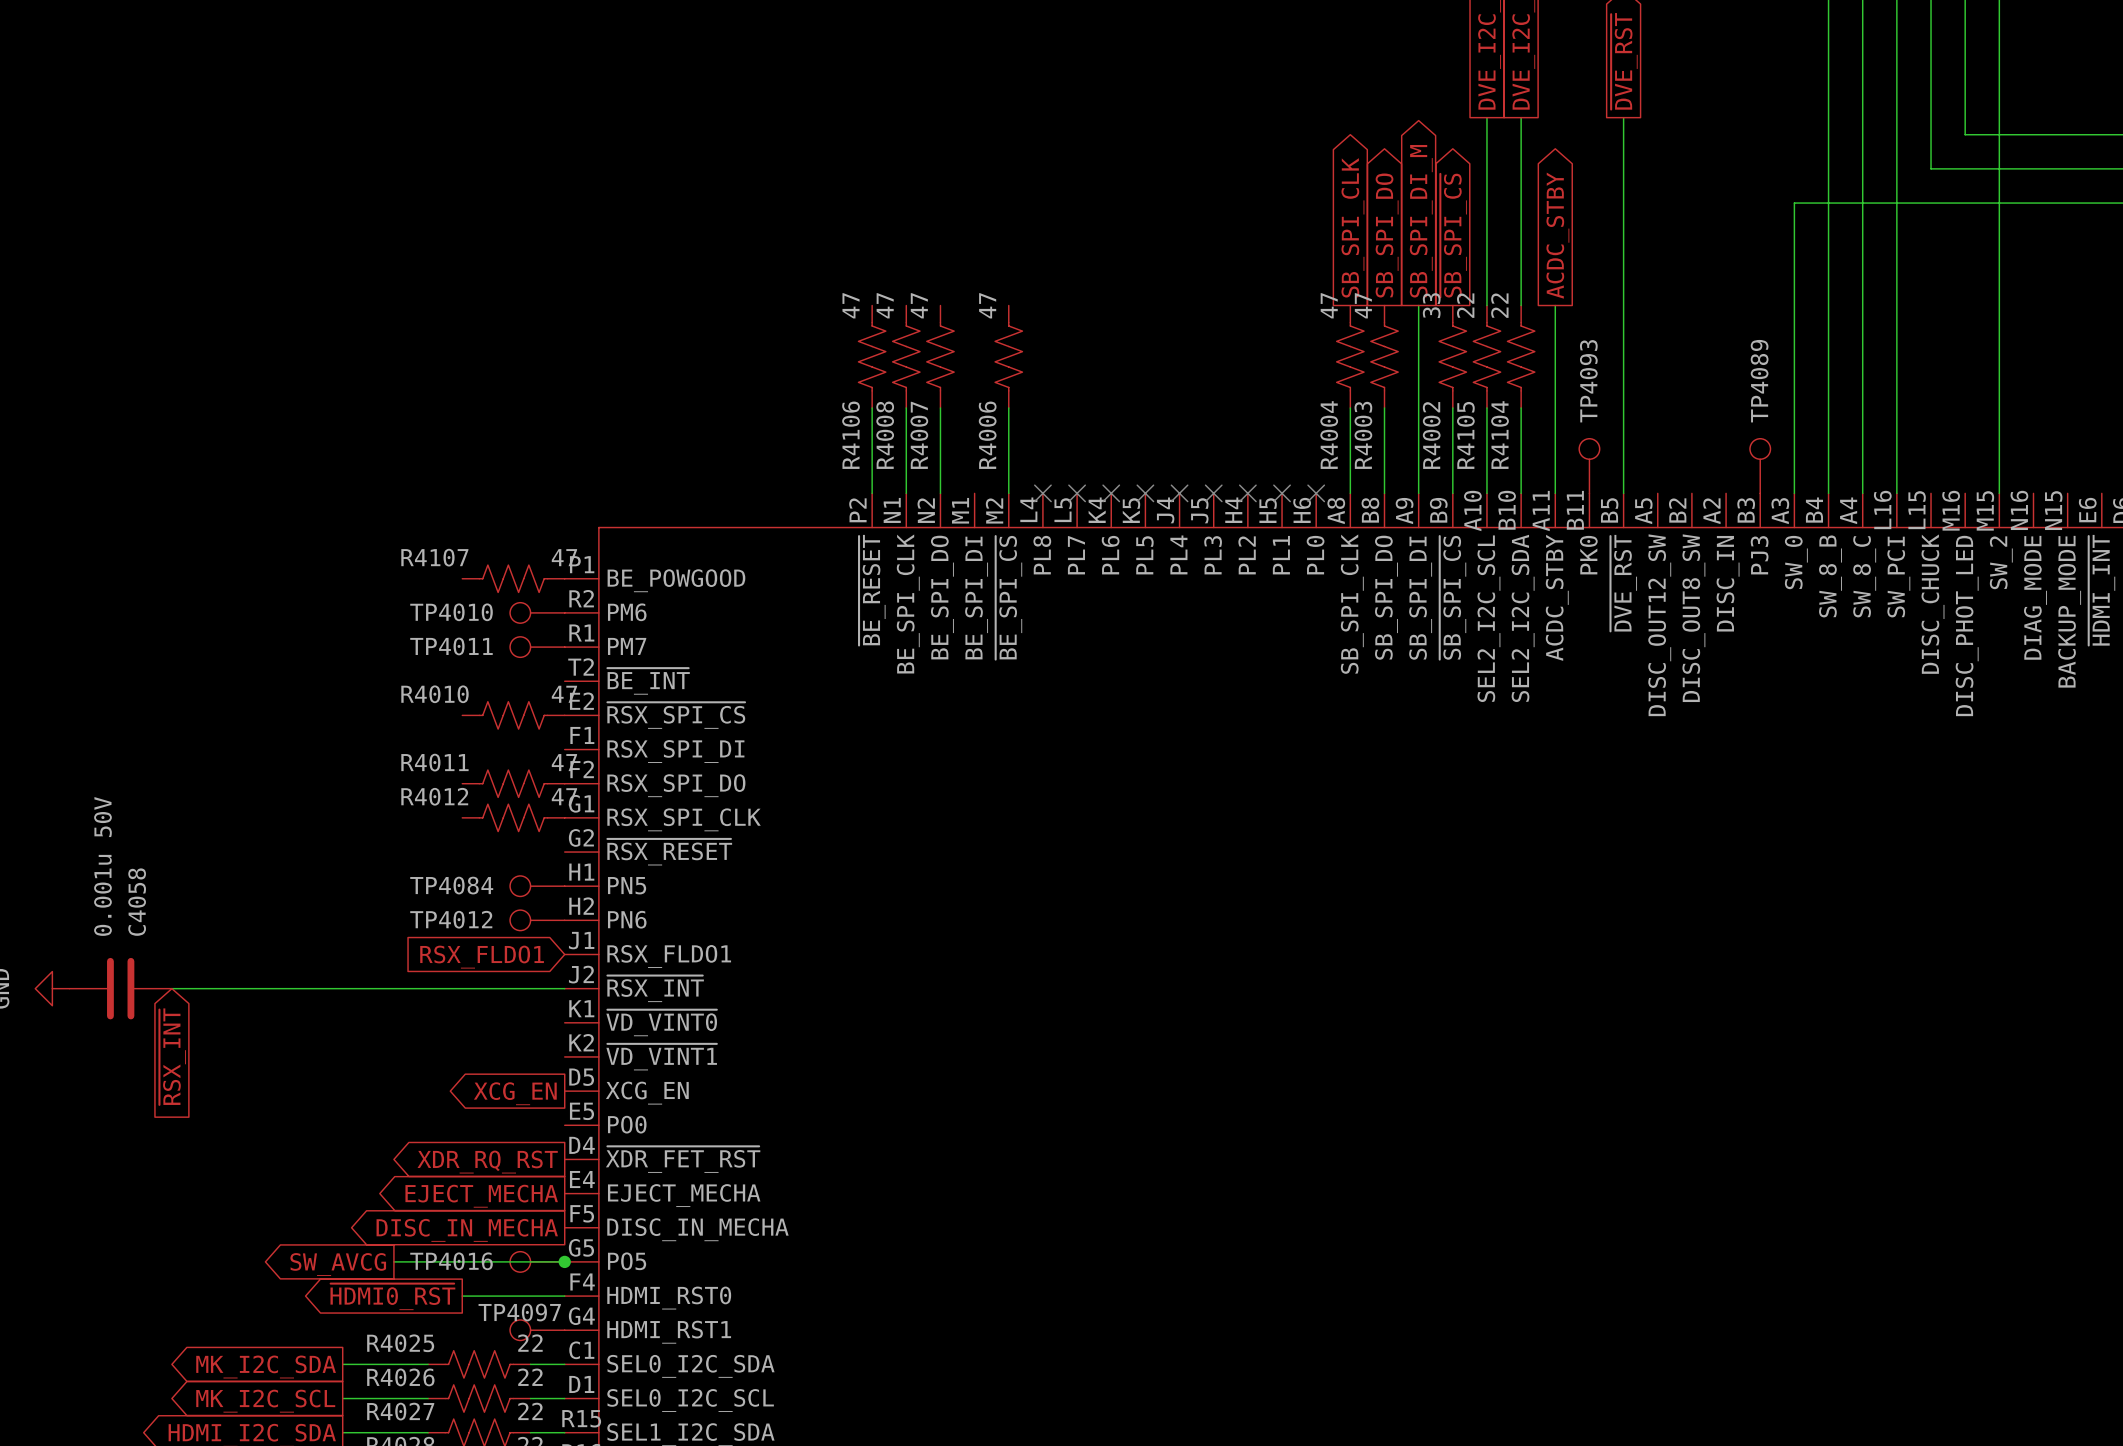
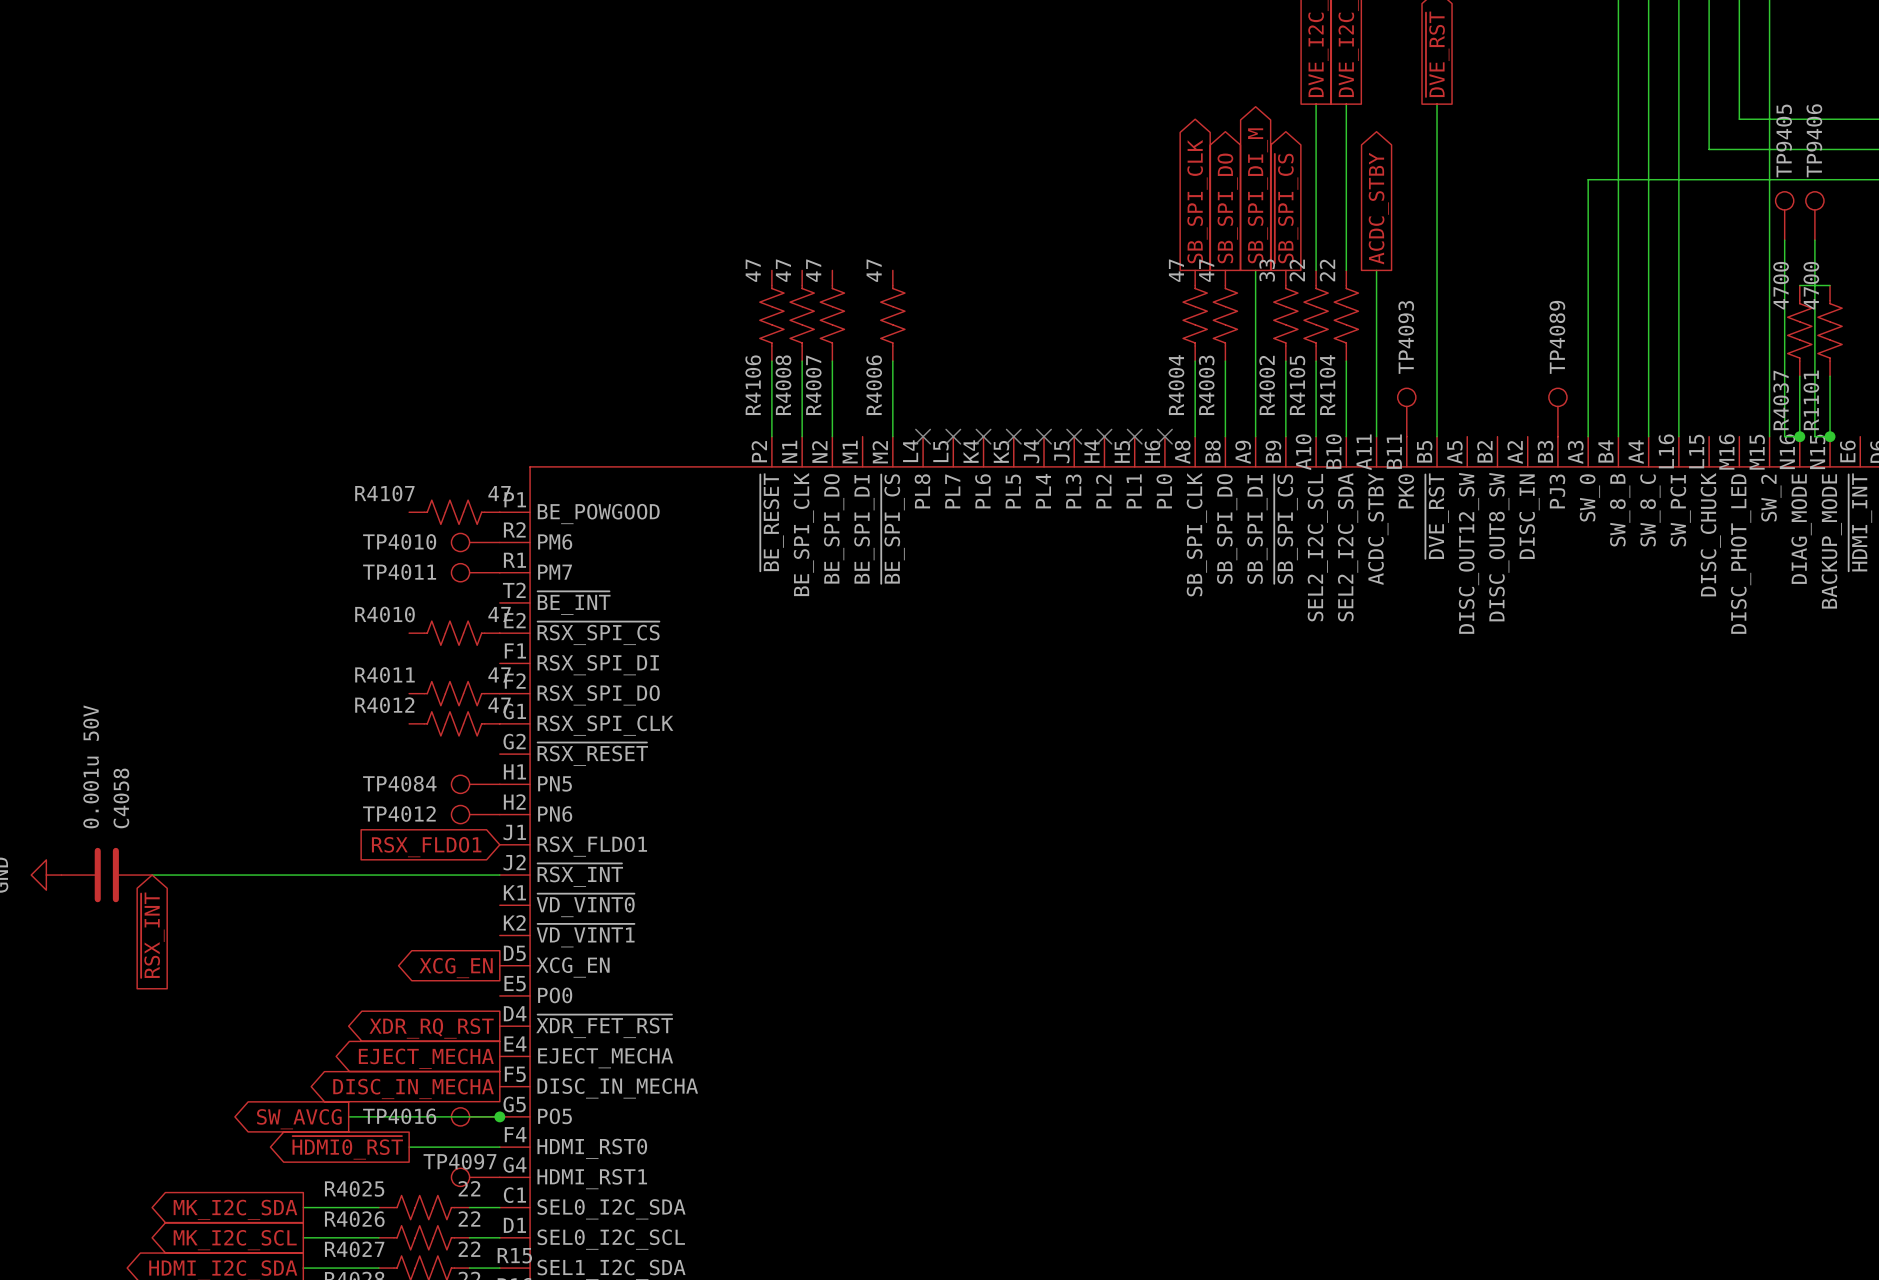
TP9405: none -> (1784, 215)
TP9406: none -> (1814, 215)
wire: none -> (1784, 240) (1784, 436) (1799, 436) (1799, 376)
wire: none -> (1814, 240) (1814, 436) (1830, 436) (1830, 376)
wire: none -> (1799, 285) (1830, 285)
R4037: none -> 4700 (1799, 330)
R1101: none -> 4700 (1830, 330)
junction: none -> (1799, 436)
junction: none -> (1830, 436)

